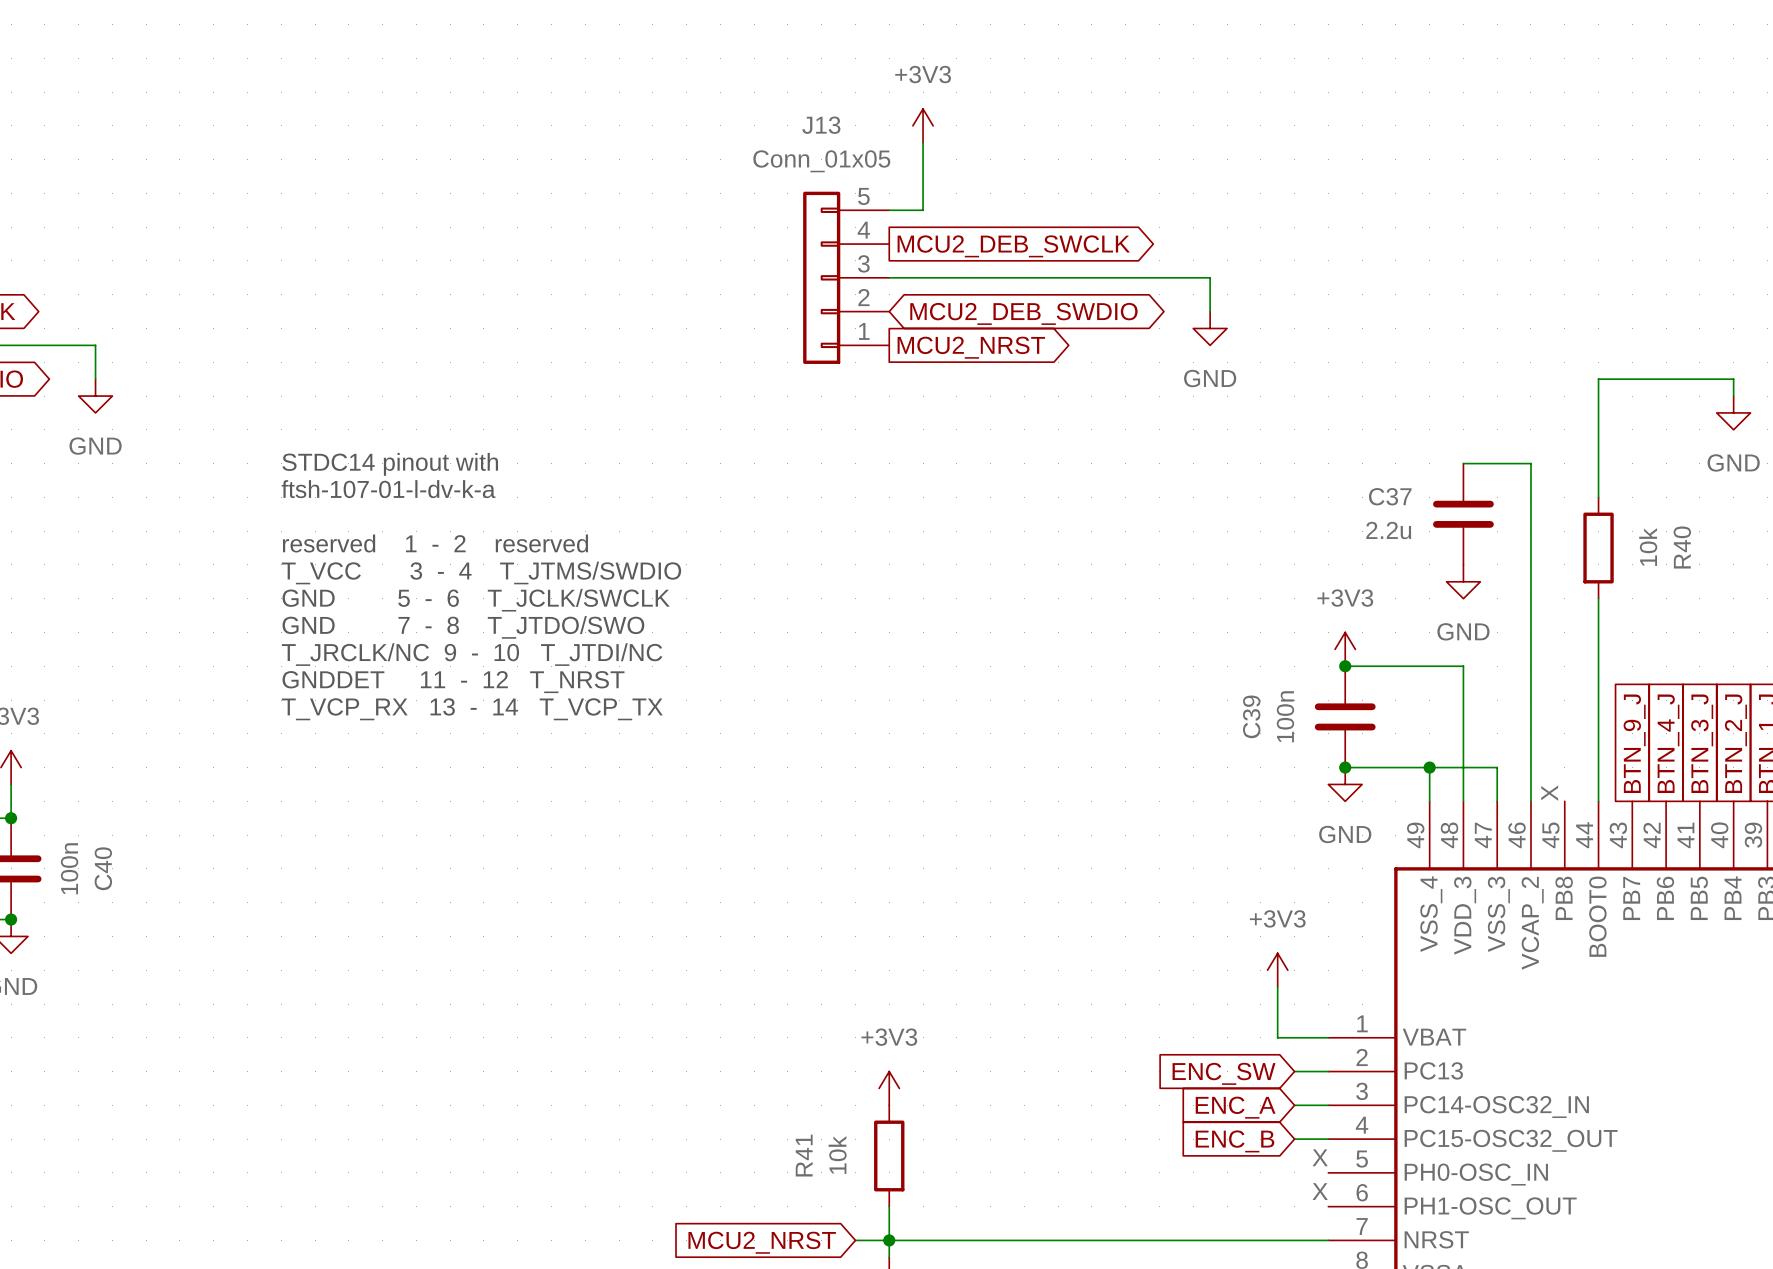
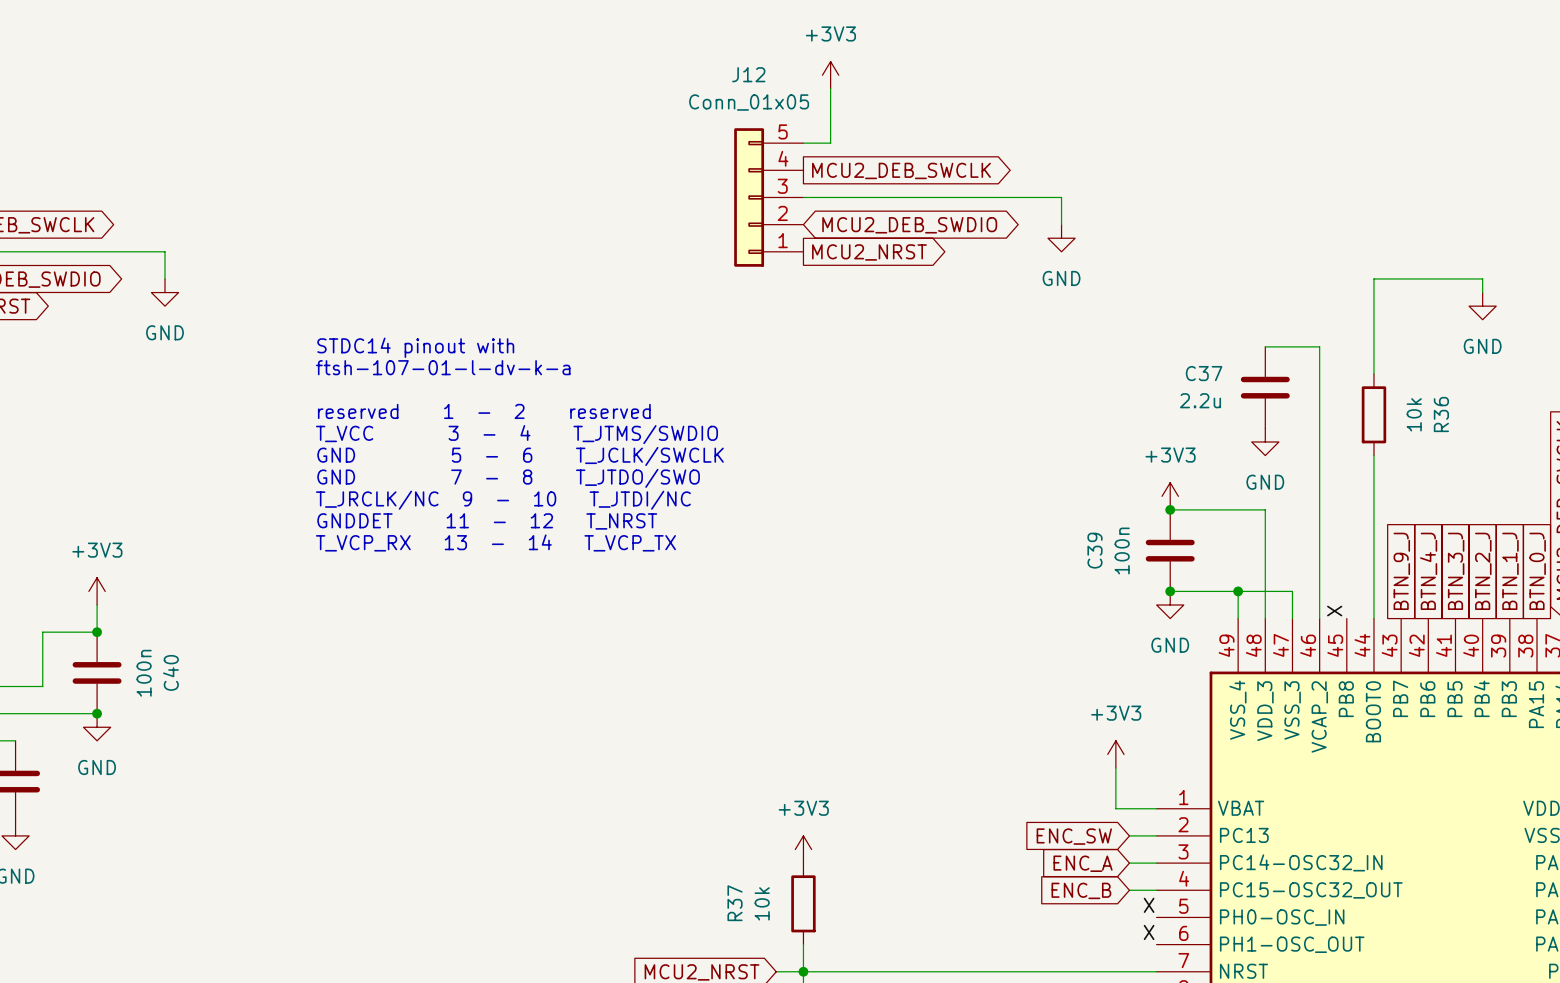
J13 name: J13 (821, 125) -> J12 (748, 74)
R40 name: R40 (1682, 547) -> R36 (1441, 414)
R41 name: R41 (804, 1155) -> R37 (735, 903)

